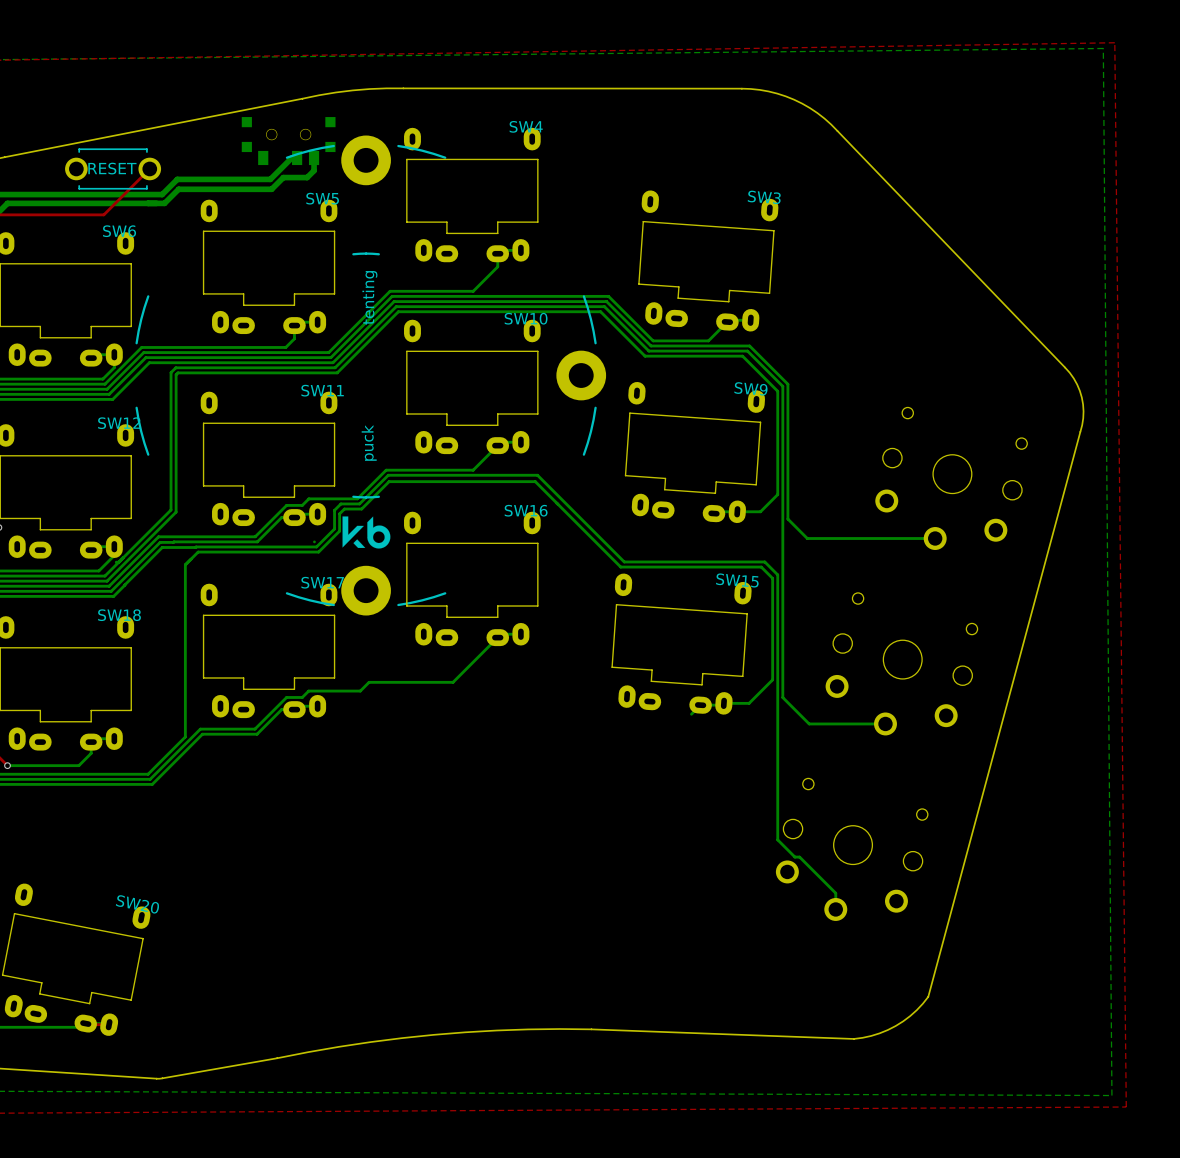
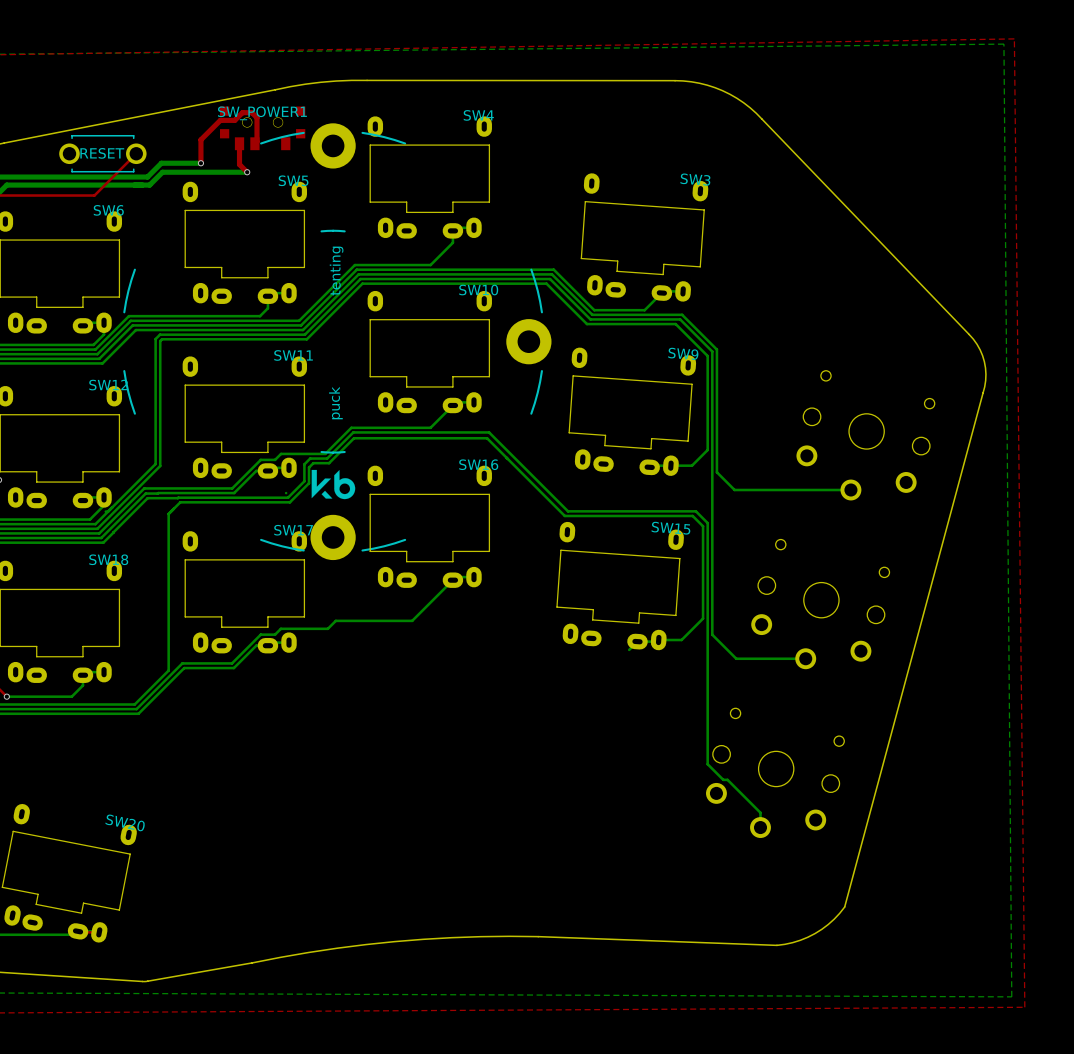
SW_POWER1 side: bottom (288, 141) -> top (262, 128)
top track: none -> (239, 143) (239, 164) (247, 172)
top track: none -> (255, 142) (256, 117) (251, 112) (242, 112) (234, 120) (220, 120) (200, 139) (200, 163)
bottom track: (297, 157) (291, 157) (270, 179) (220, 179) -> none
bottom track: (314, 157) (314, 170) (307, 177) (283, 177) (271, 189) -> none
via: none -> (200, 163)
via: none -> (247, 172)

